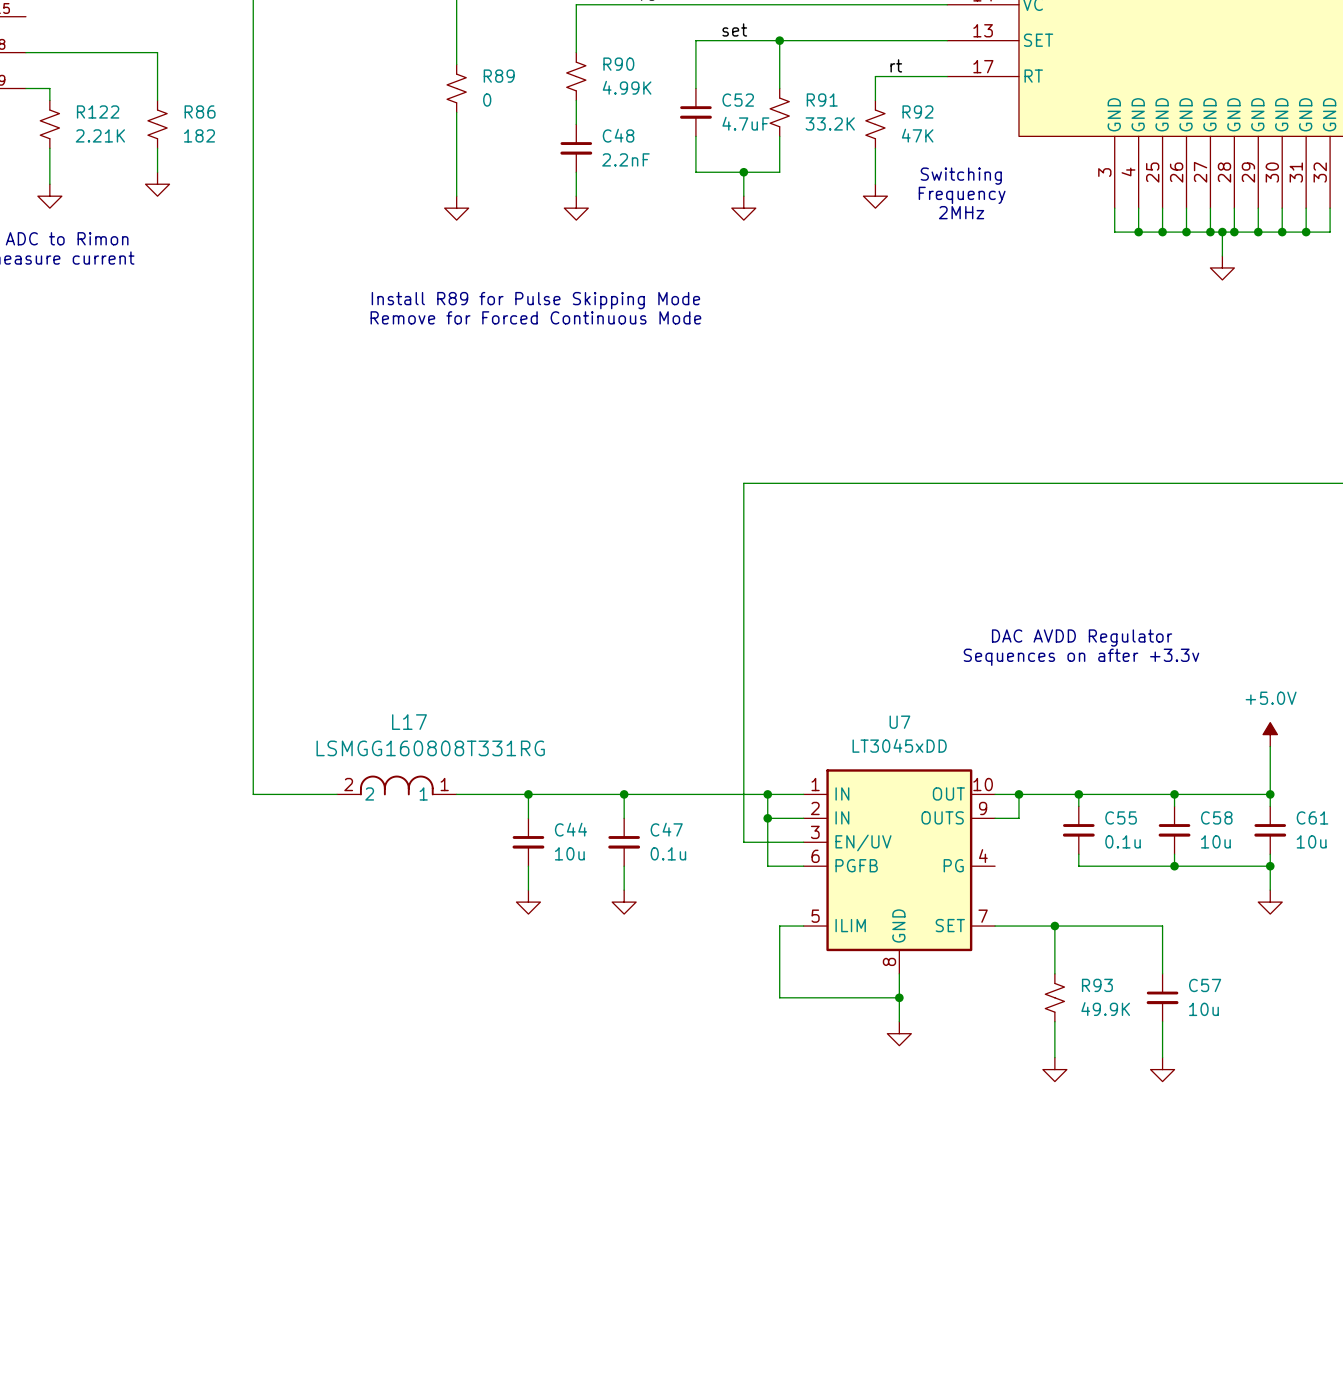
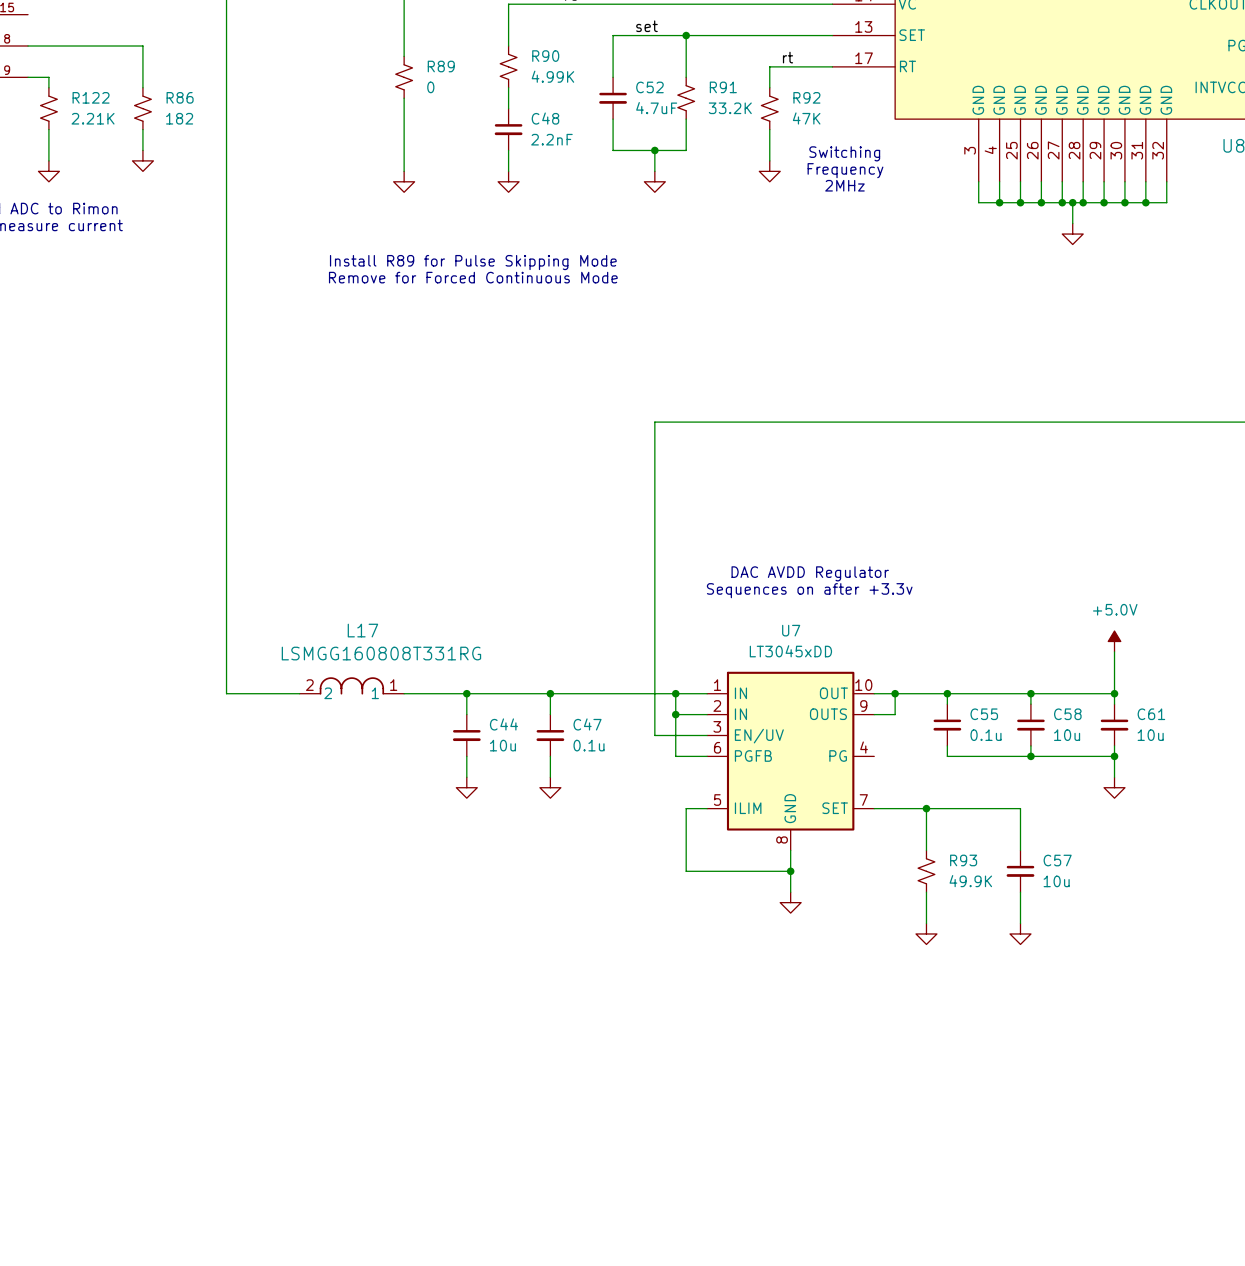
text position: DAC AVDD Regulator (1082, 638) -> DAC AVDD Regulator (810, 573)
text position: Sequences on after +3.3v (1081, 657) -> Sequences on after +3.3v (809, 590)

